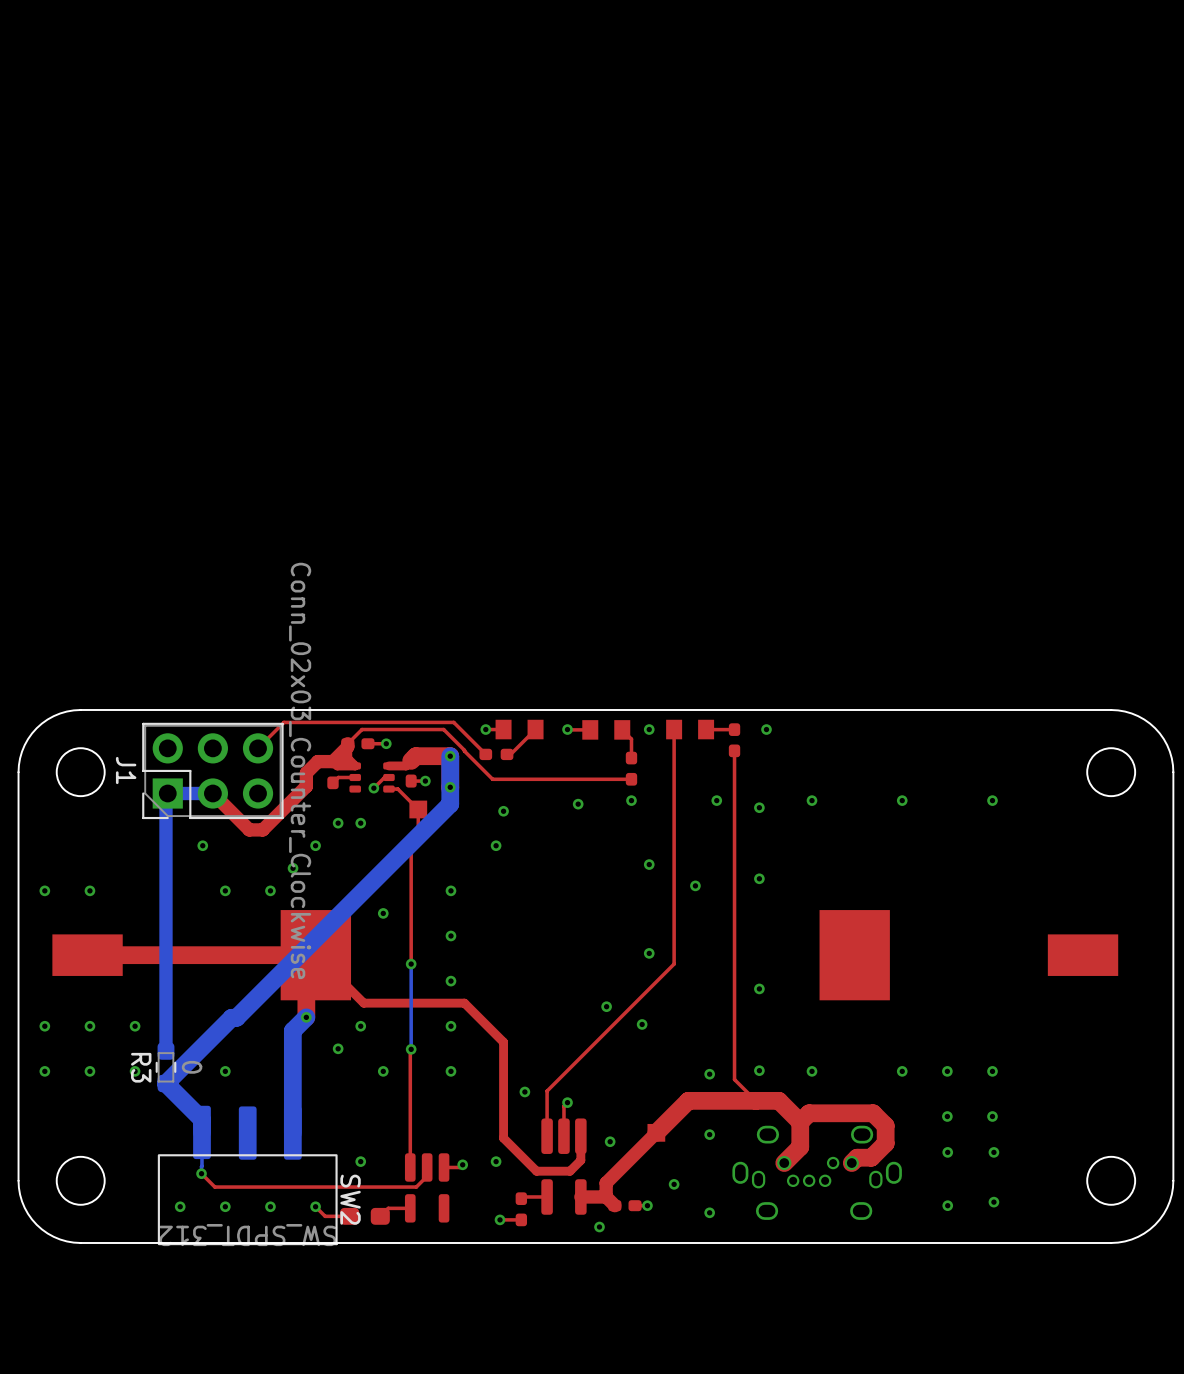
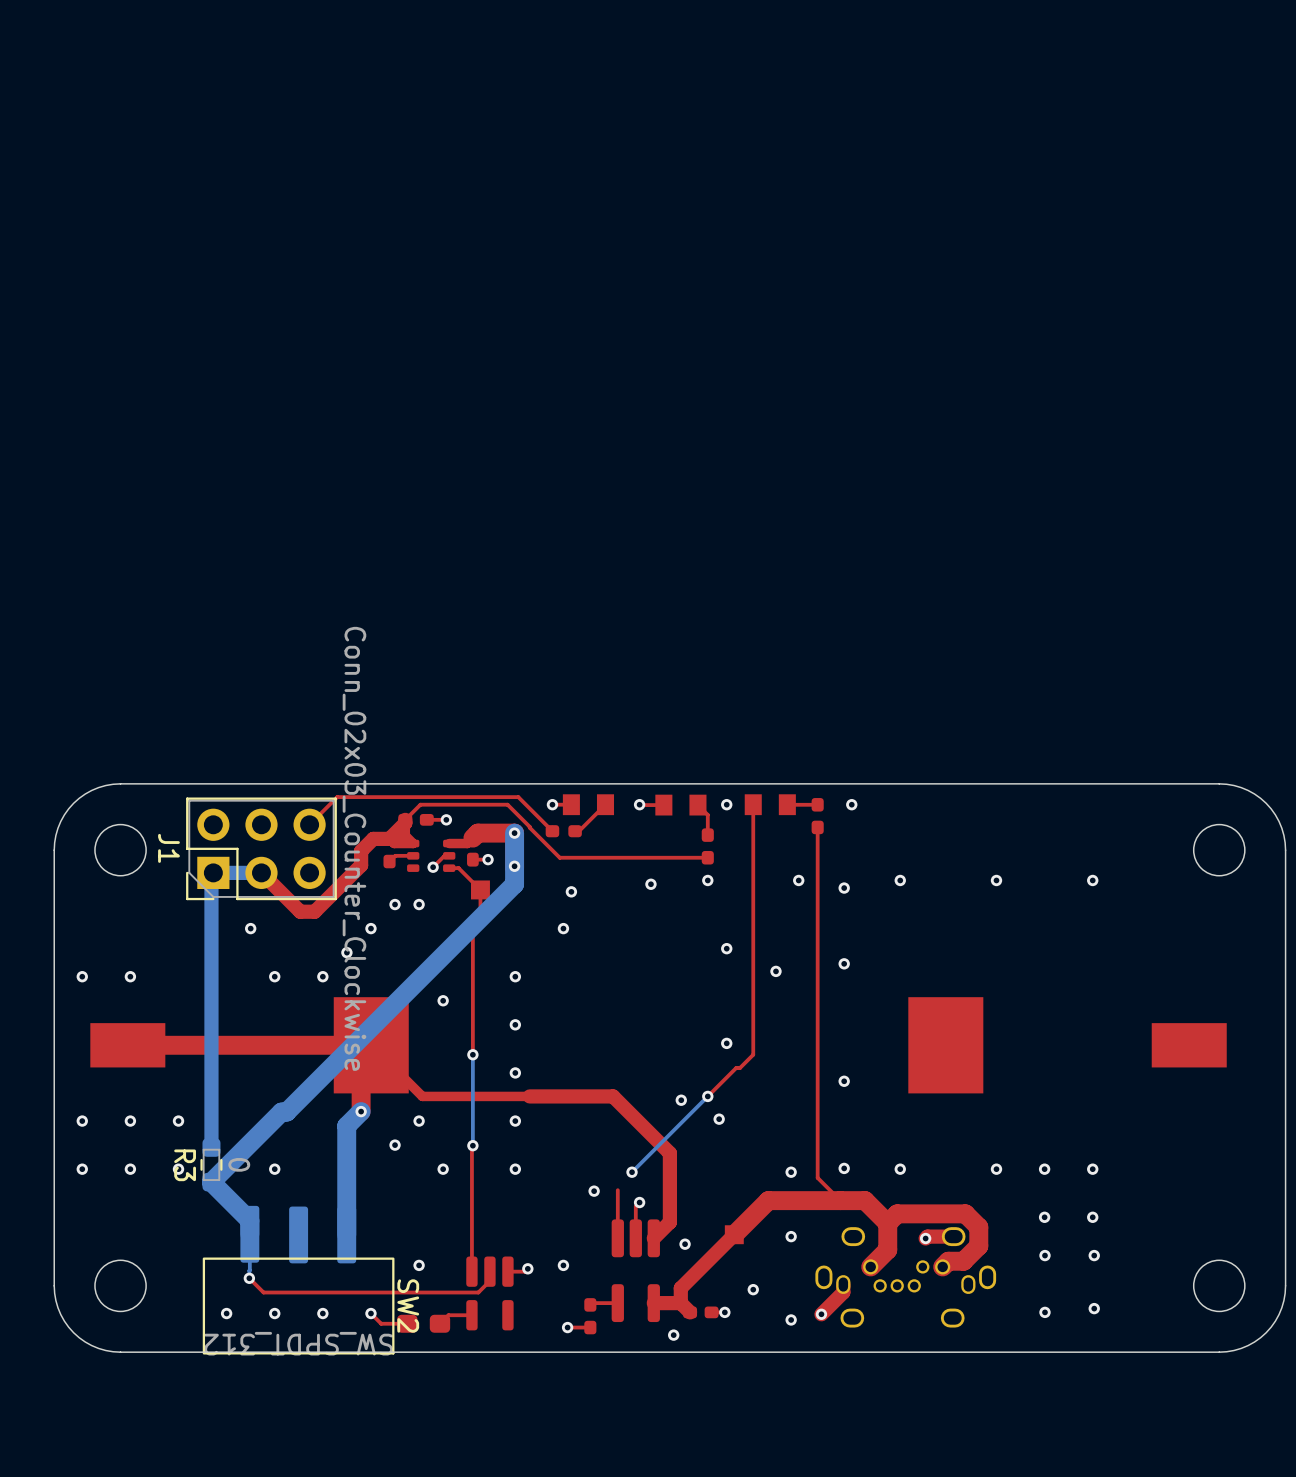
top track: (661, 976) (547, 1091) -> (739, 1068) (736, 1068) (707, 1096)
top track: (464, 1003) (503, 1042) (503, 1138) (536, 1171) (570, 1171) (580, 1160) (580, 1136) -> (529, 1096) (613, 1096) (669, 1153) (669, 1222) (653, 1238)
bottom track: none -> (707, 1096) (632, 1172)
via: none -> (707, 1096)
via: none -> (632, 1172)
top track: none -> (953, 1236) (927, 1236) (925, 1238)
via: none -> (925, 1238)
top track: none -> (843, 1284) (843, 1292) (821, 1314)
via: none -> (821, 1314)

